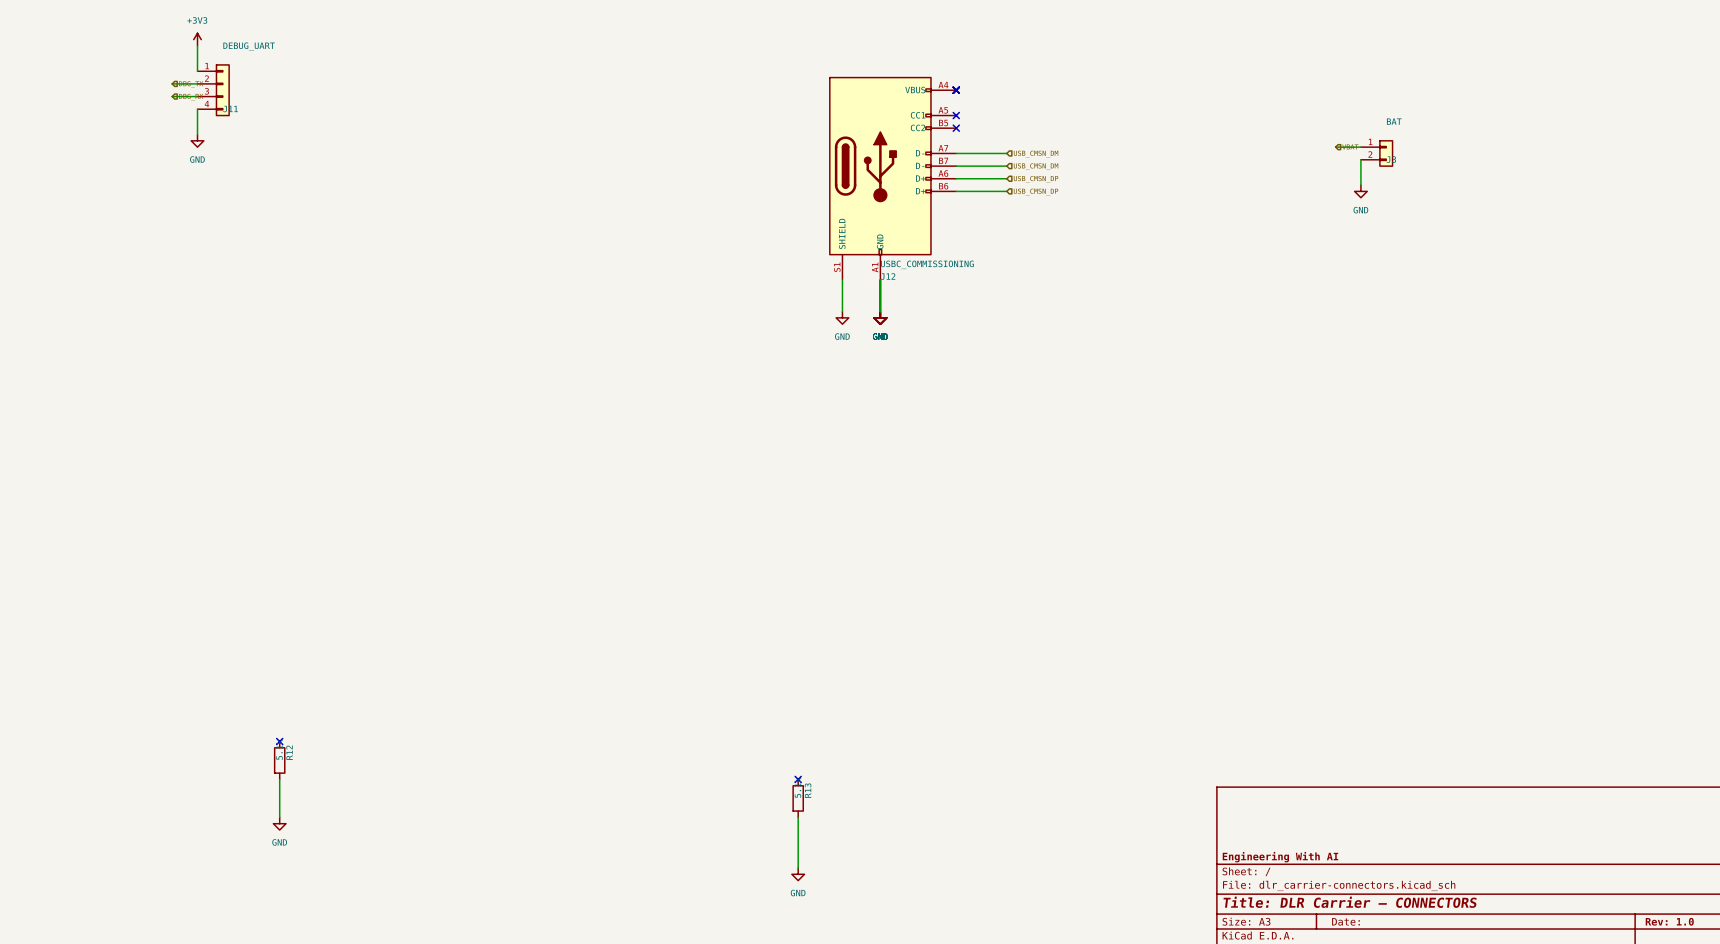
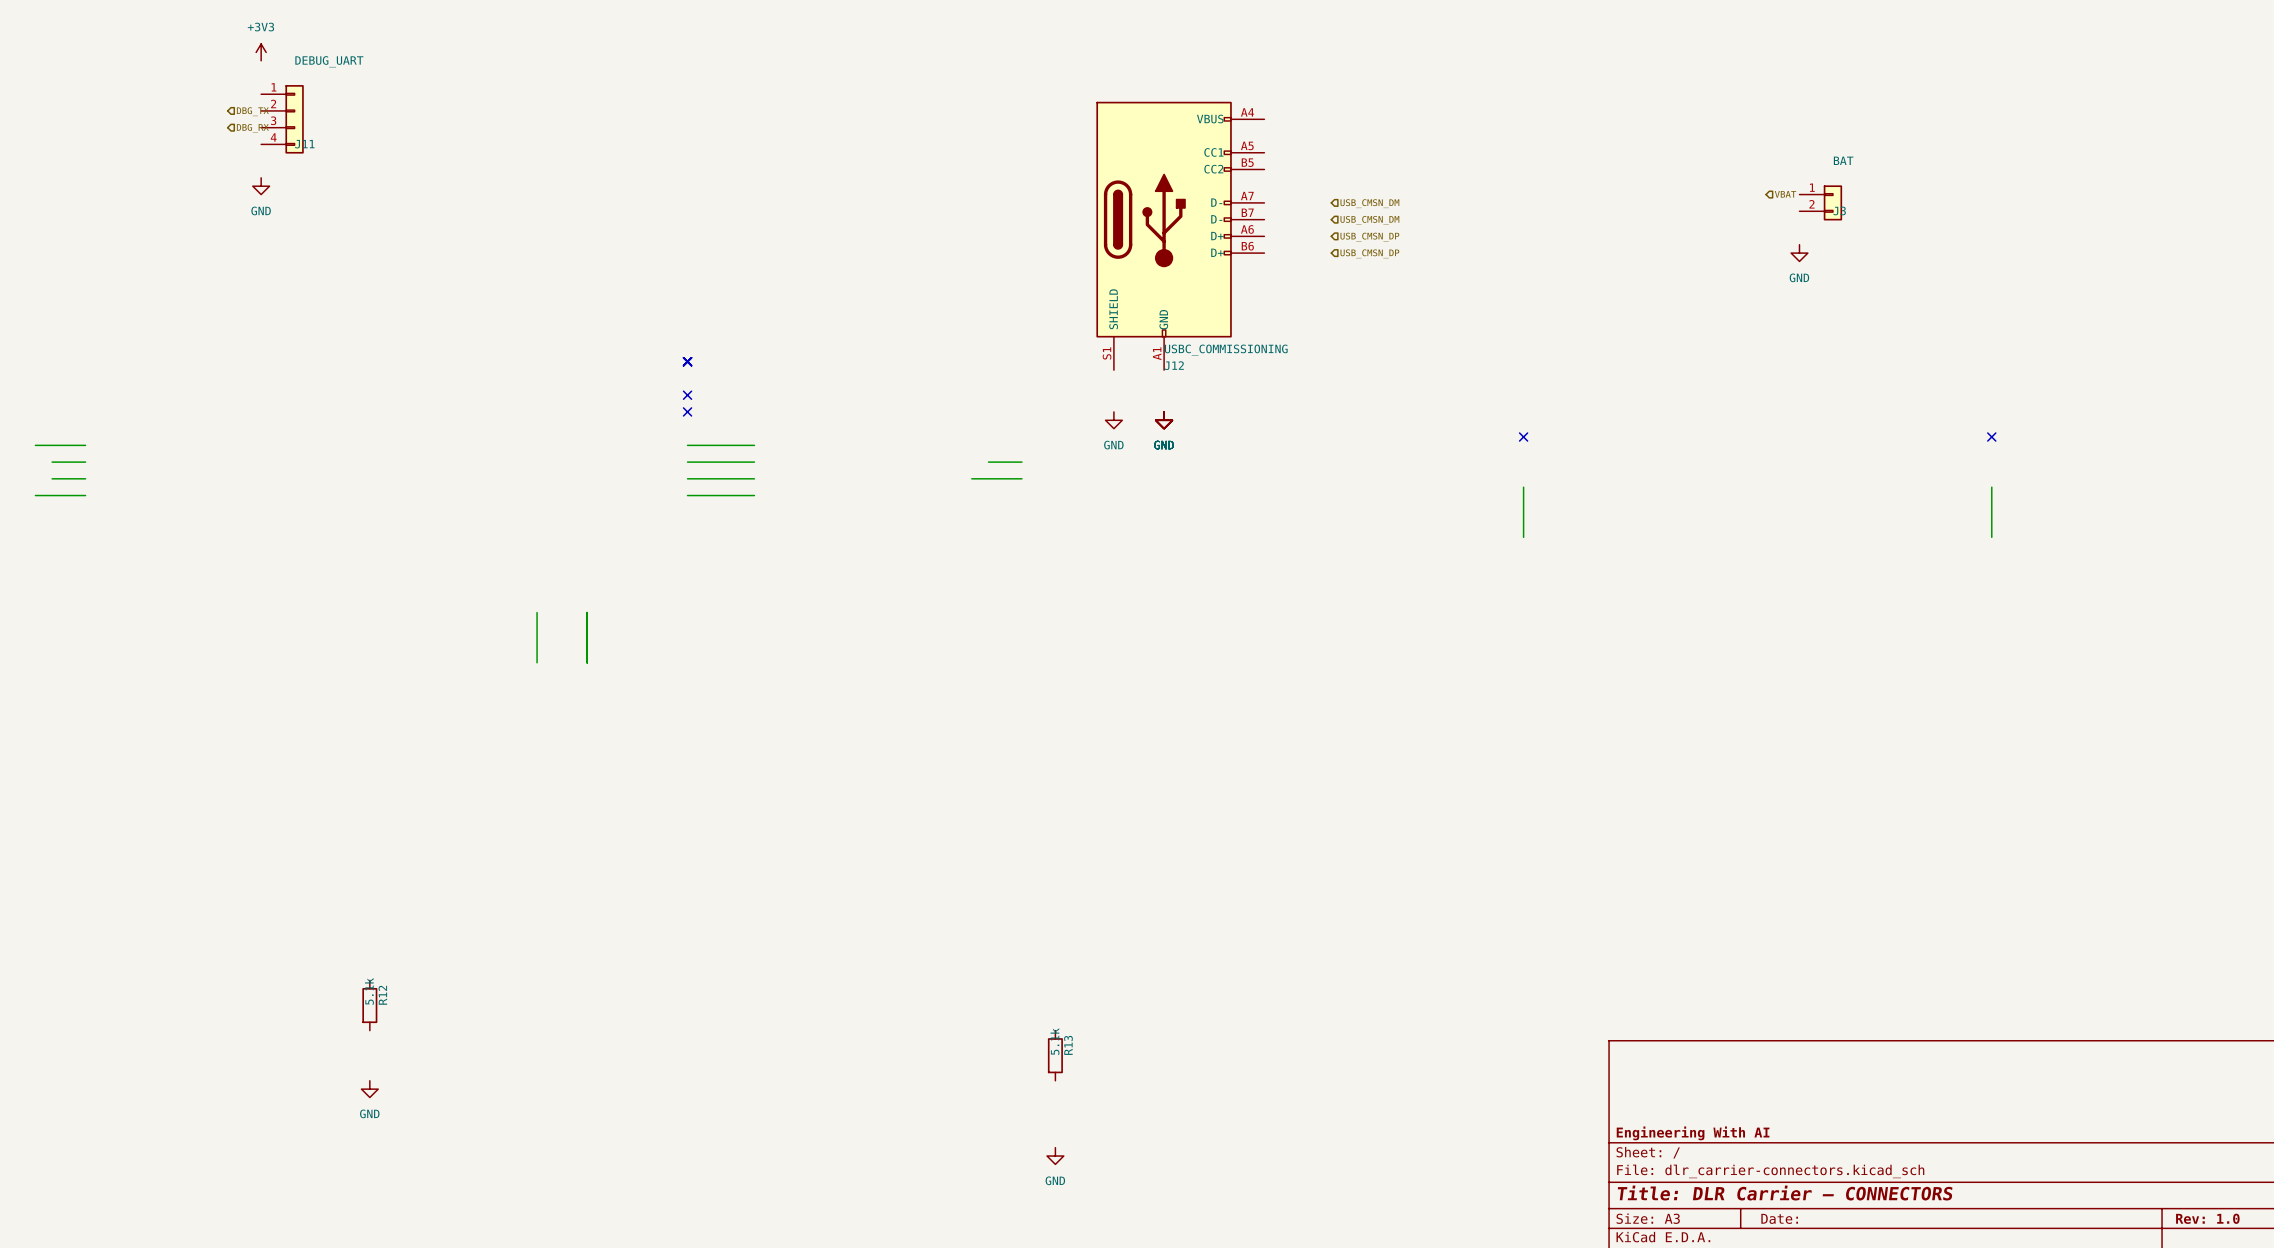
wire: (197, 45) (197, 71) -> none
wire: (172, 83) (197, 83) -> none
no-connect mark: (956, 90) -> none
wire: (172, 96) (197, 96) -> none
wire: (197, 109) (197, 134) -> none
no-connect mark: (956, 115) -> none
no-connect mark: (956, 128) -> none
wire: (1335, 147) (1360, 147) -> none
wire: (956, 153) (1006, 153) -> none
wire: (1360, 159) (1360, 185) -> none
wire: (956, 166) (1006, 166) -> none
wire: (956, 178) (1006, 178) -> none
wire: (956, 191) (1006, 191) -> none
no-connect mark: none -> (687, 361)
wire: (842, 279) (842, 311) -> none
wire: (880, 279) (880, 311) -> none
no-connect mark: none -> (687, 395)
no-connect mark: none -> (687, 411)
no-connect mark: none -> (1523, 437)
no-connect mark: none -> (1991, 437)
wire: none -> (35, 445) (85, 445)
wire: none -> (687, 445) (754, 445)
wire: none -> (52, 462) (85, 462)
wire: none -> (687, 462) (754, 462)
wire: none -> (988, 462) (1021, 462)
wire: none -> (52, 478) (85, 478)
wire: none -> (687, 478) (754, 478)
wire: none -> (971, 478) (1021, 478)
wire: none -> (1523, 487) (1523, 537)
wire: none -> (1991, 487) (1991, 537)
wire: none -> (35, 495) (85, 495)
wire: none -> (687, 495) (754, 495)
wire: none -> (537, 612) (537, 662)
wire: none -> (587, 612) (587, 662)
no-connect mark: (279, 741) -> none
wire: (279, 779) (279, 817) -> none
no-connect mark: (798, 779) -> none
wire: (798, 817) (798, 867) -> none

